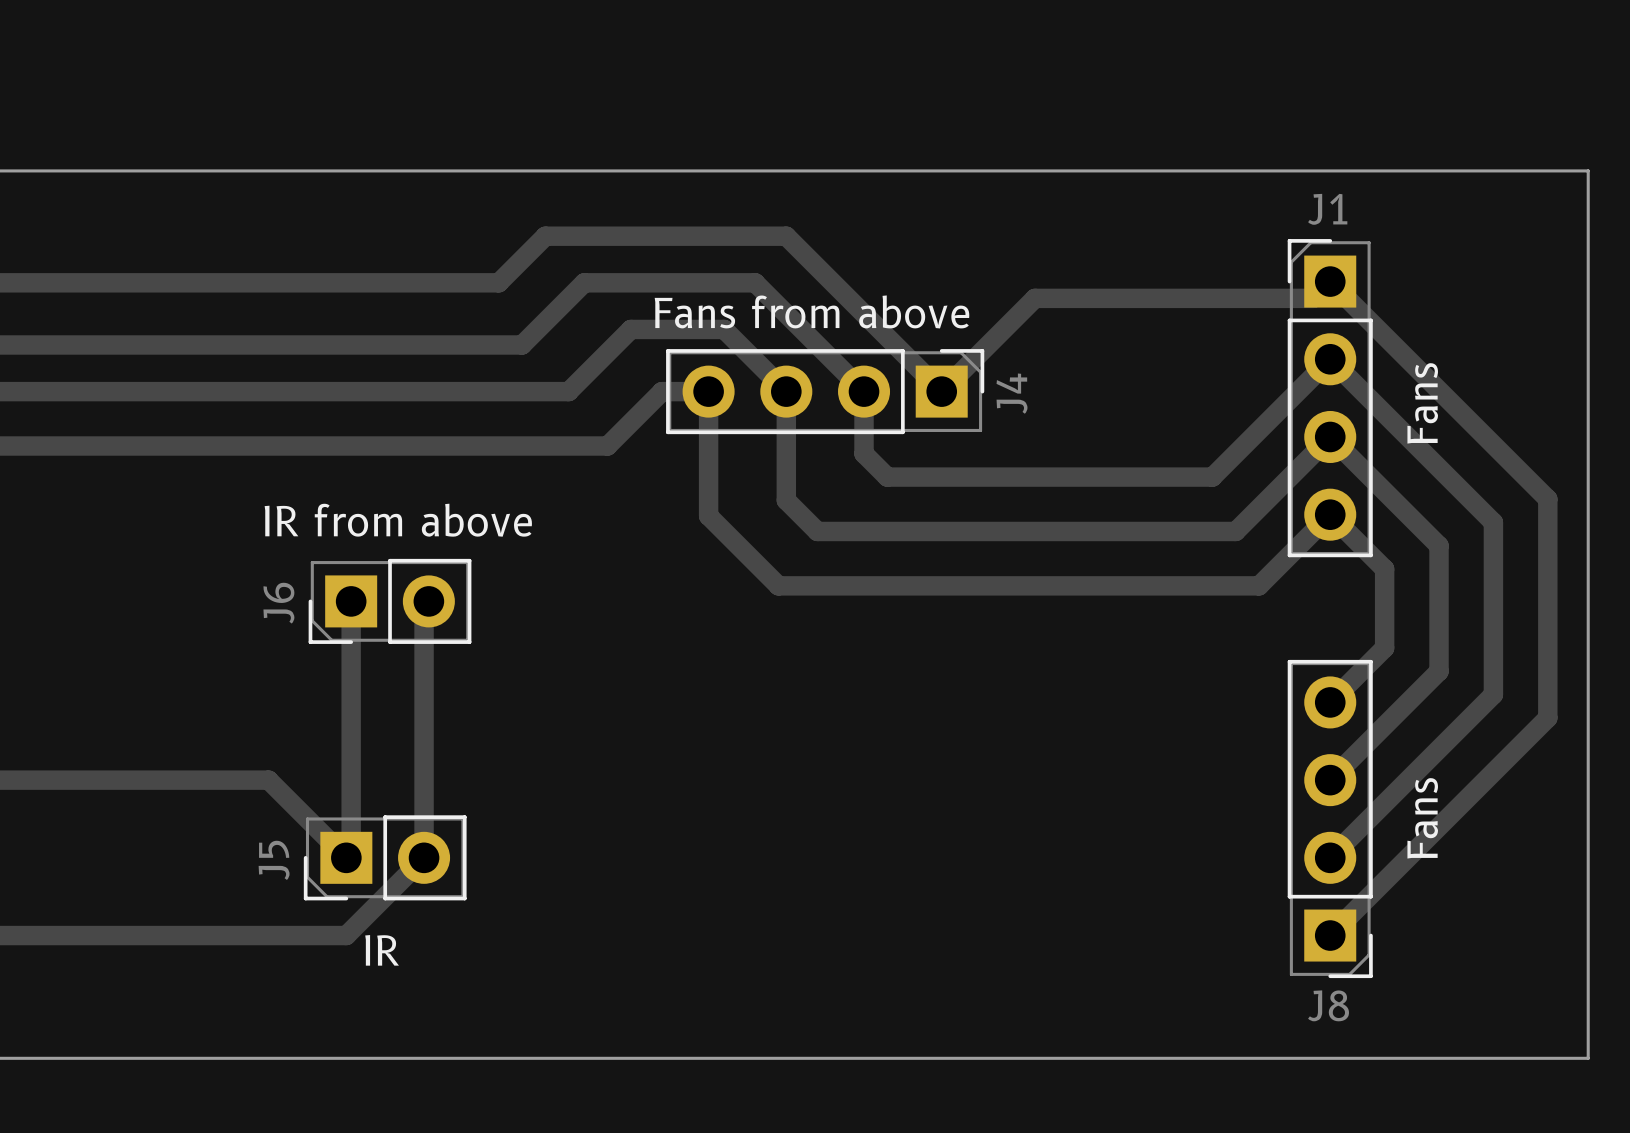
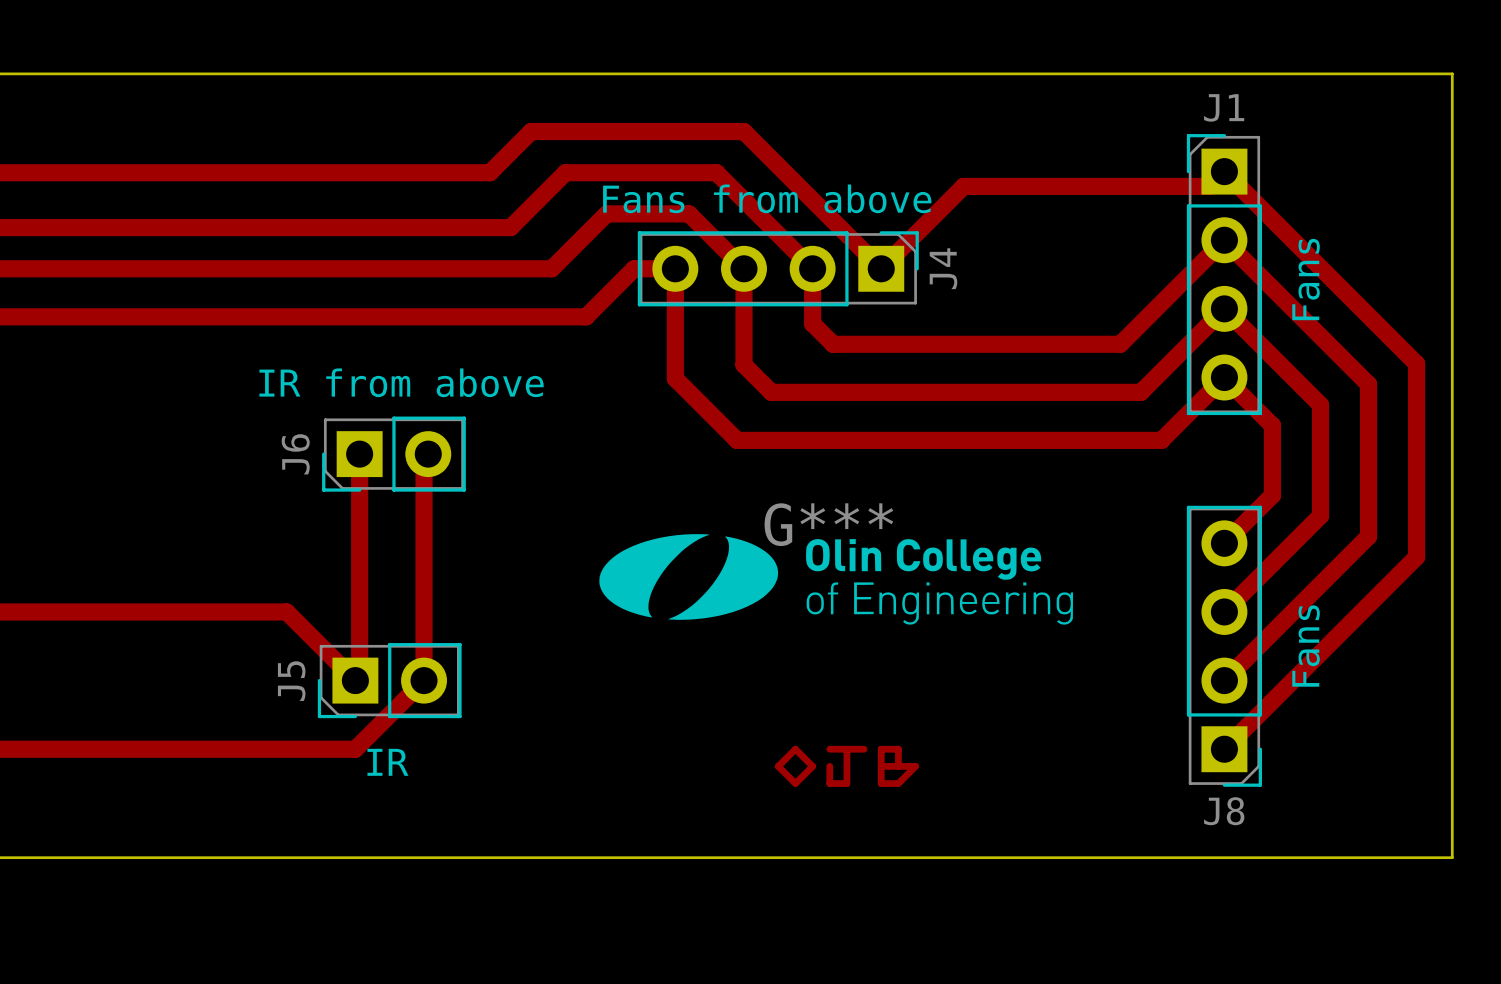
G***: none -> (836, 579)
track: none -> (795, 749) (812, 766) (795, 783) (778, 766) (795, 749)
track: none -> (829, 749) (864, 749)
track: none -> (846, 749) (846, 783) (829, 783) (829, 766)
track: none -> (881, 766) (915, 766) (898, 783) (881, 783) (881, 749) (898, 749) (898, 766)

